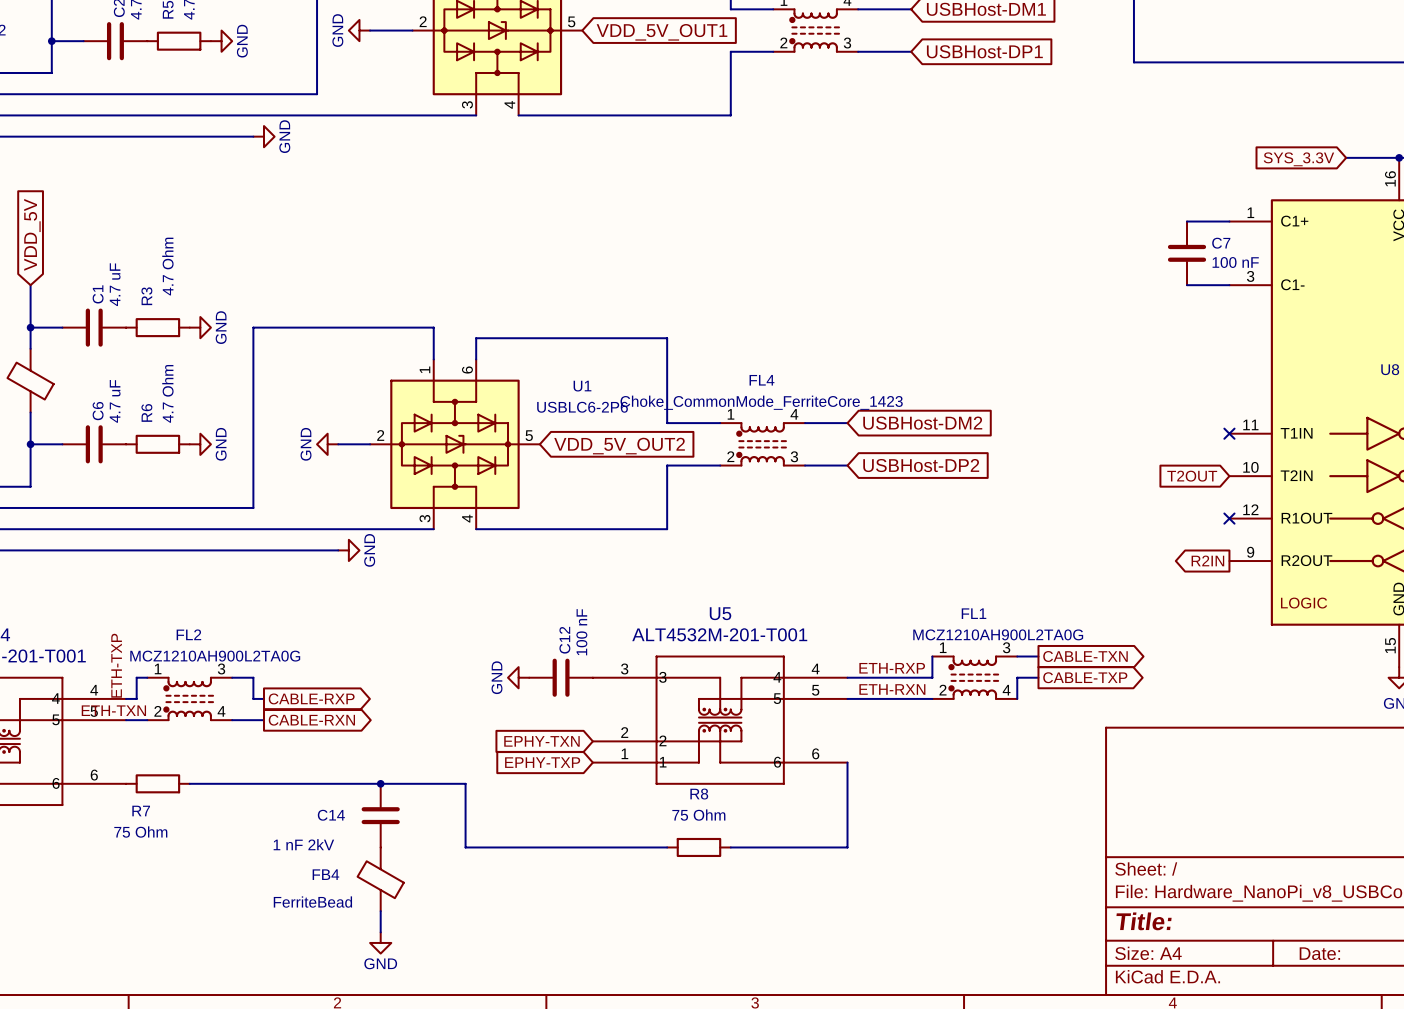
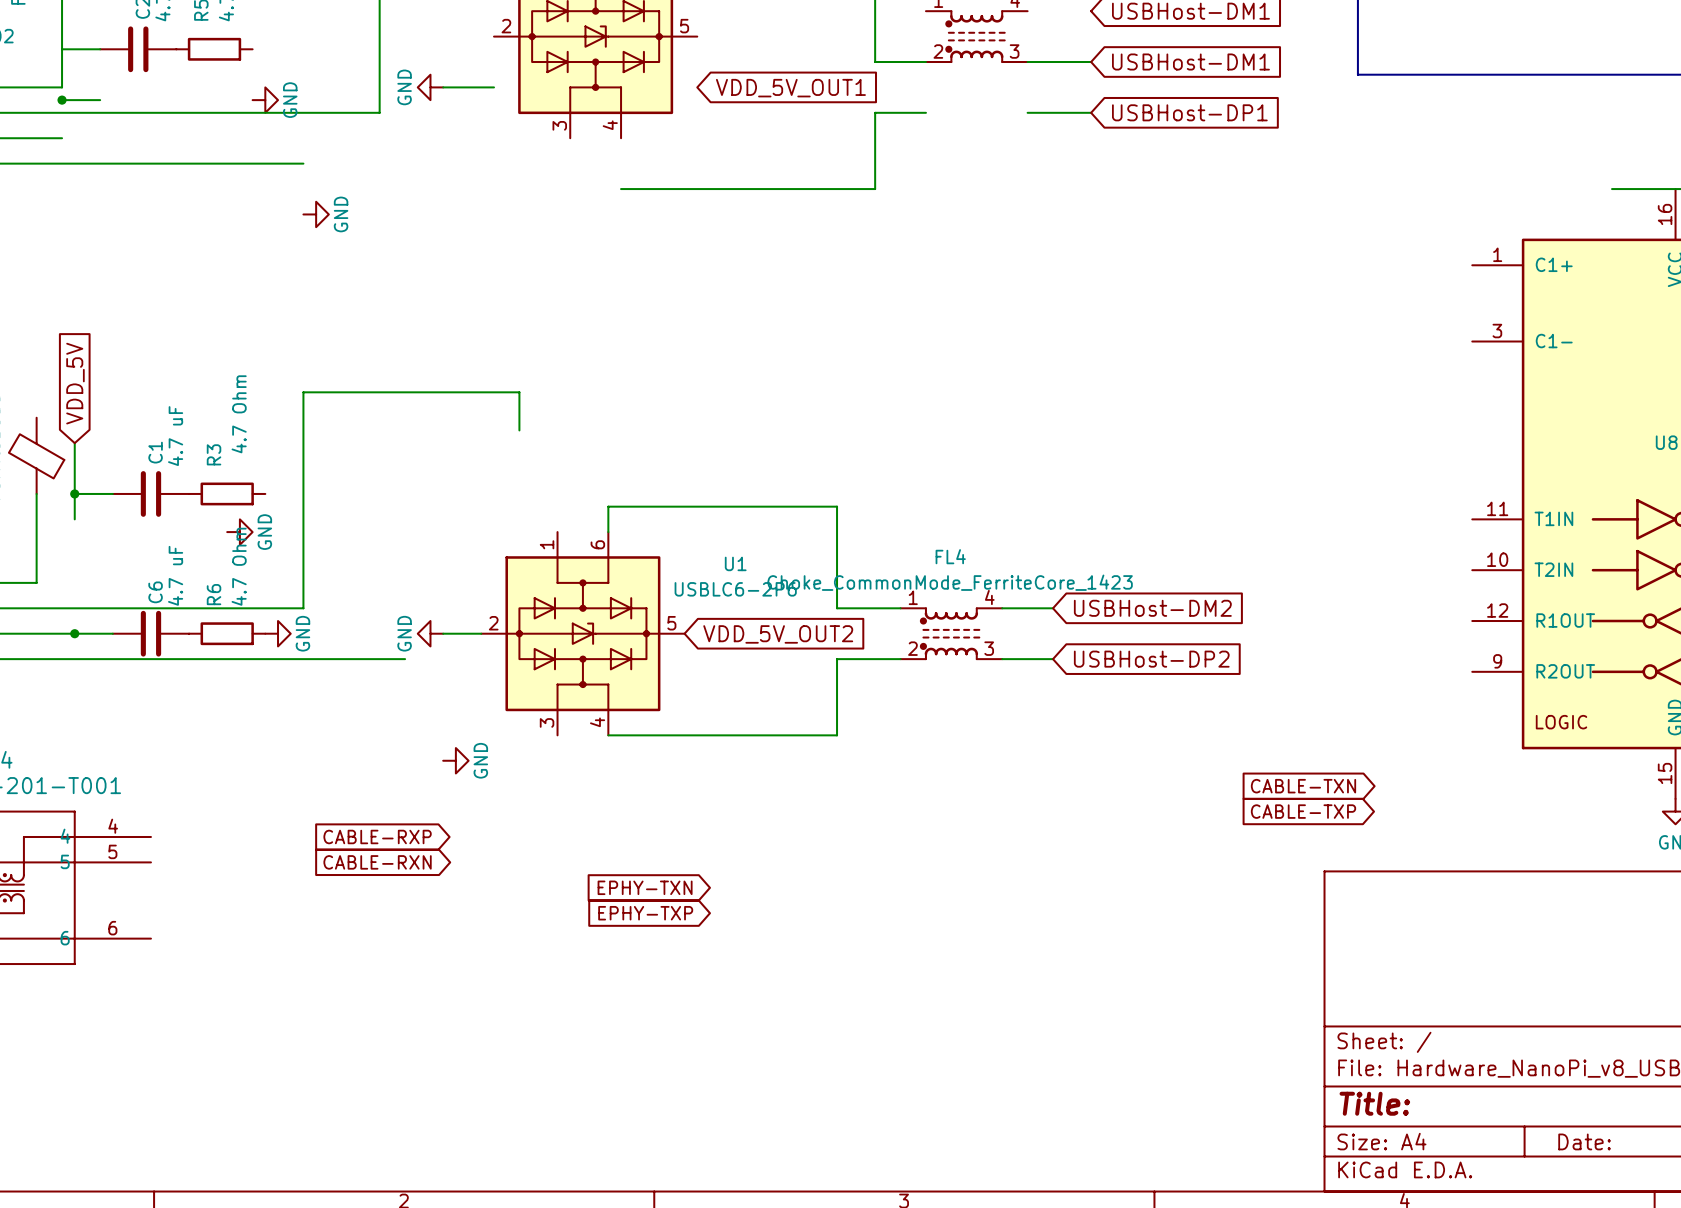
wire: (730, 9) (773, 9) -> (875, 11) (875, 62)
wire: (858, 9) (911, 9) -> (1027, 112) (1091, 112)
power symbol position: GND (359, 30) -> GND (430, 87)
wire: (370, 30) (412, 30) -> (443, 87) (494, 87)
global label position: VDD_5V_OUT1 (662, 32) -> VDD_5V_OUT1 (790, 88)
junction: (51, 41) -> none
power symbol: GND (221, 41) -> none
wire: (730, 51) (730, 94) -> (925, 112) (875, 112)
global label: USBHost-DP1 (984, 51) -> USBHost-DM1 (1190, 62)
wire: none -> (62, 100) (100, 100)
junction: none -> (62, 100)
power symbol: none -> GND (265, 100)
global label: none -> USBHost-DP1 (1189, 112)
wire: (51, 115) (476, 115) -> none
wire: (518, 115) (730, 115) -> (621, 189) (875, 189) (875, 138)
power symbol: GND (263, 136) -> none
junction: (1399, 157) -> none
global label: SYS_3.3V (1298, 159) -> none
power symbol: none -> GND (316, 214)
wire: (1187, 221) (1229, 221) -> none
global label position: VDD_5V (32, 234) -> VDD_5V (75, 383)
C7: 100 nF (1187, 253) -> none
wire: (30, 285) (30, 348) -> (74, 443) (74, 519)
wire: (1187, 285) (1229, 285) -> none
wire: (30, 327) (62, 327) -> (74, 493) (112, 493)
junction: (30, 327) -> none
C1 position: (94, 327) -> (150, 493)
R3 position: (157, 327) -> (227, 493)
power symbol: GND (200, 327) -> none
wire: (476, 359) (476, 338) (667, 338) (667, 423) -> (608, 532) (608, 506) (798, 506)
wire: (698, 423) (720, 423) -> (837, 506) (837, 608) (900, 608)
wire: (805, 423) (847, 423) -> (1002, 608) (1053, 608)
global label position: USBHost-DM2 (922, 423) -> USBHost-DM2 (1152, 608)
no-connect mark: (1229, 433) -> none
wire: (30, 444) (62, 444) -> none
junction position: (30, 444) -> (74, 493)
C6 position: (94, 444) -> (150, 633)
R6 position: (157, 444) -> (227, 633)
power symbol: GND (327, 444) -> none
wire: (338, 444) (370, 444) -> none
U1 position: (454, 444) -> (582, 633)
FL4 position: (762, 444) -> (951, 633)
global label position: VDD_5V_OUT2 (619, 446) -> VDD_5V_OUT2 (778, 634)
wire: (720, 465) (667, 465) (667, 529) (476, 529) -> (900, 659) (837, 659) (837, 735) (608, 735)
wire: (805, 465) (847, 465) -> (1002, 659) (1053, 659)
global label position: USBHost-DP2 (921, 465) -> USBHost-DP2 (1151, 659)
global label: T2OUT (1192, 476) -> none
no-connect mark: (1229, 518) -> none
junction: none -> (74, 633)
wire: (94, 529) (370, 529) -> none
power symbol: none -> GND (278, 633)
power symbol rotation: 0° (348, 550) -> 180° (430, 633)
power symbol position: GND (348, 550) -> GND (430, 633)
global label: R2IN (1207, 560) -> none
power symbol: none -> GND (455, 760)
wire: (932, 656) (932, 677) (847, 677) -> none
wire: (1017, 656) (1038, 656) -> none
label: ETH-TXP (116, 665) -> none
label: ETH-RXP (892, 668) -> none
wire: (147, 677) (136, 677) (136, 698) (126, 698) -> none
wire: (232, 677) (253, 677) (253, 698) (263, 698) -> none
power symbol: GND (518, 677) -> none
C12: 100 nF (561, 677) -> none
FL1: MCZ1210AH900L2TA0G (974, 677) -> none
wire: (1038, 677) (1017, 677) (1017, 698) -> none
label: ETH-RXN (892, 689) -> none
FL2: MCZ1210AH900L2TA0G (189, 698) -> none
wire: (847, 698) (932, 698) -> none
label: ETH-TXN (113, 710) -> none
wire: (126, 720) (147, 720) -> none
wire: (232, 720) (263, 720) -> none
U5: ALT4532M-201-T001 (720, 720) -> none
wire: (847, 762) (847, 847) (730, 847) -> none
R7: 75 Ohm (157, 783) -> none
wire: (189, 783) (465, 783) (465, 847) (667, 847) -> none
junction: (380, 783) -> none
C14: 1 nF 2kV (380, 815) -> none
R8: 75 Ohm (698, 847) -> none
FB4: FerriteBead (380, 879) -> none
wire: (380, 911) (380, 932) -> none
power symbol: GND (380, 942) -> none

